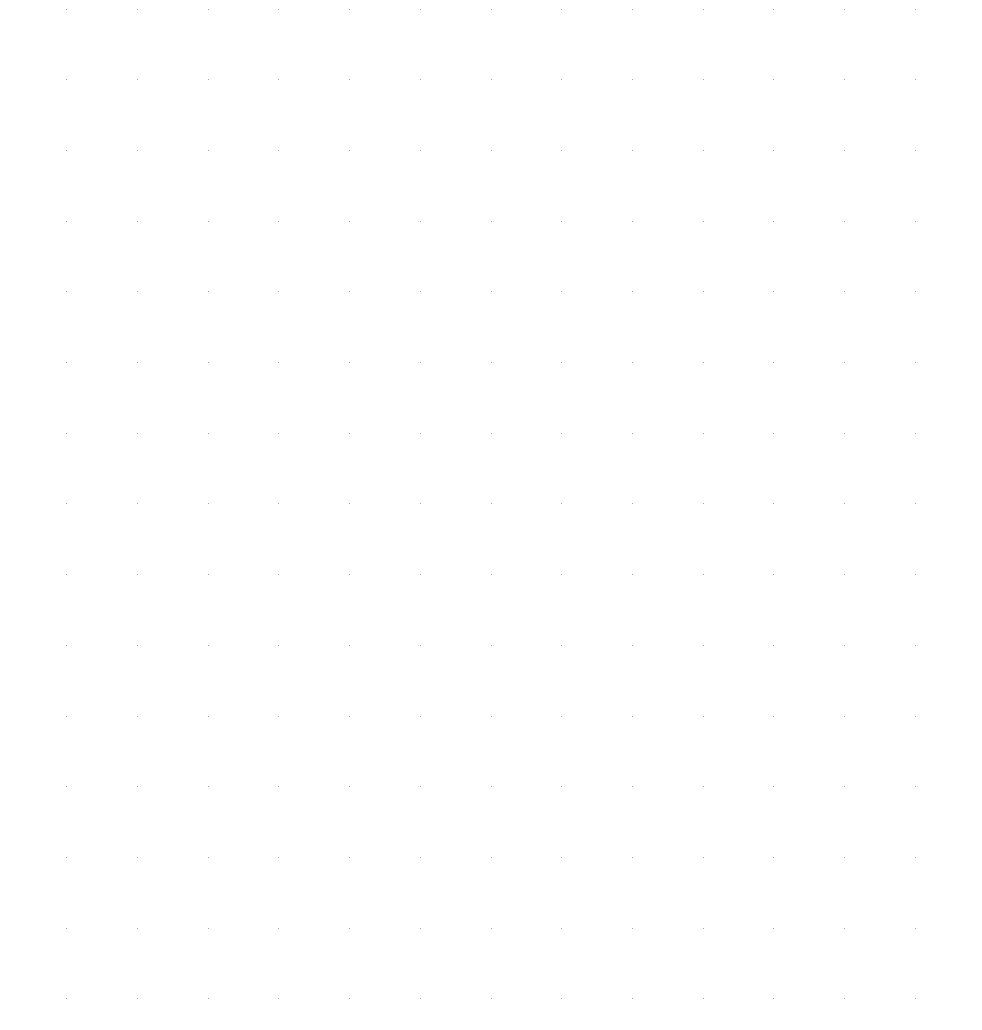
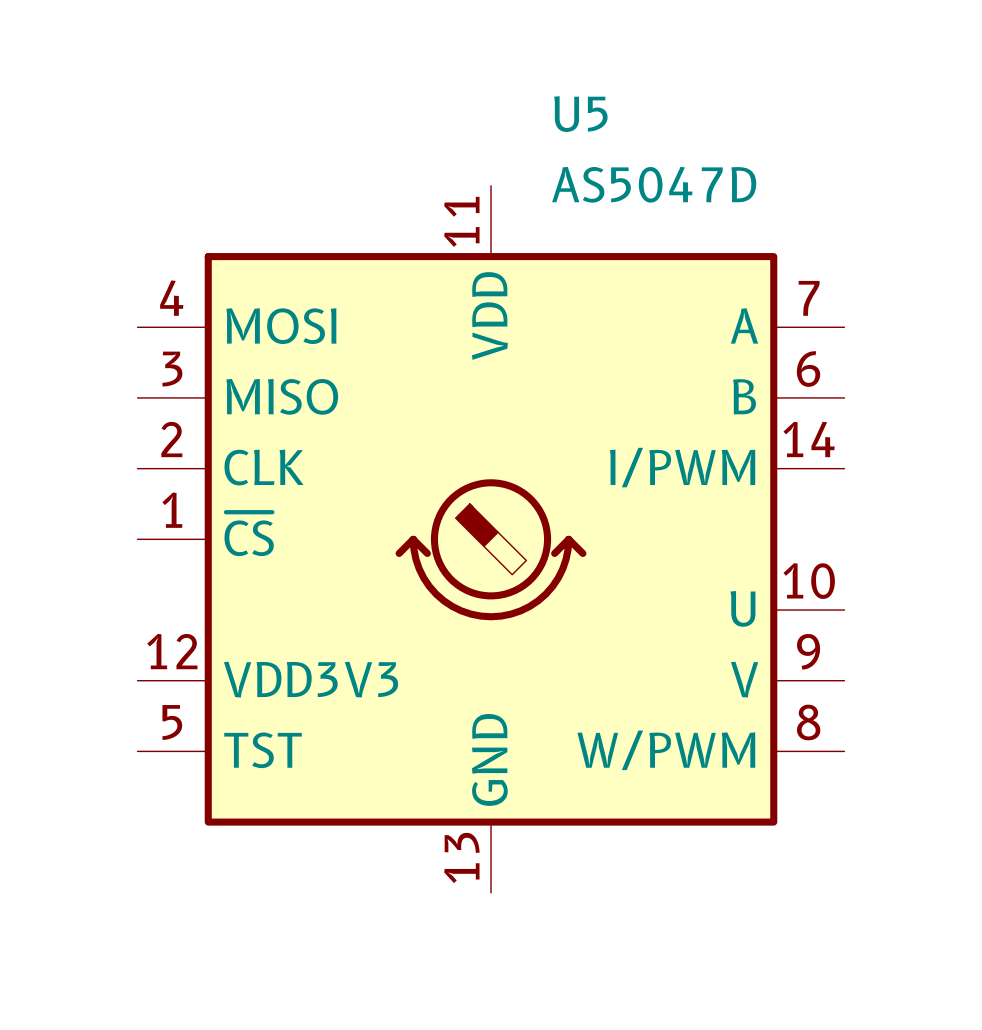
U5: none -> AS5047D (491, 539)

